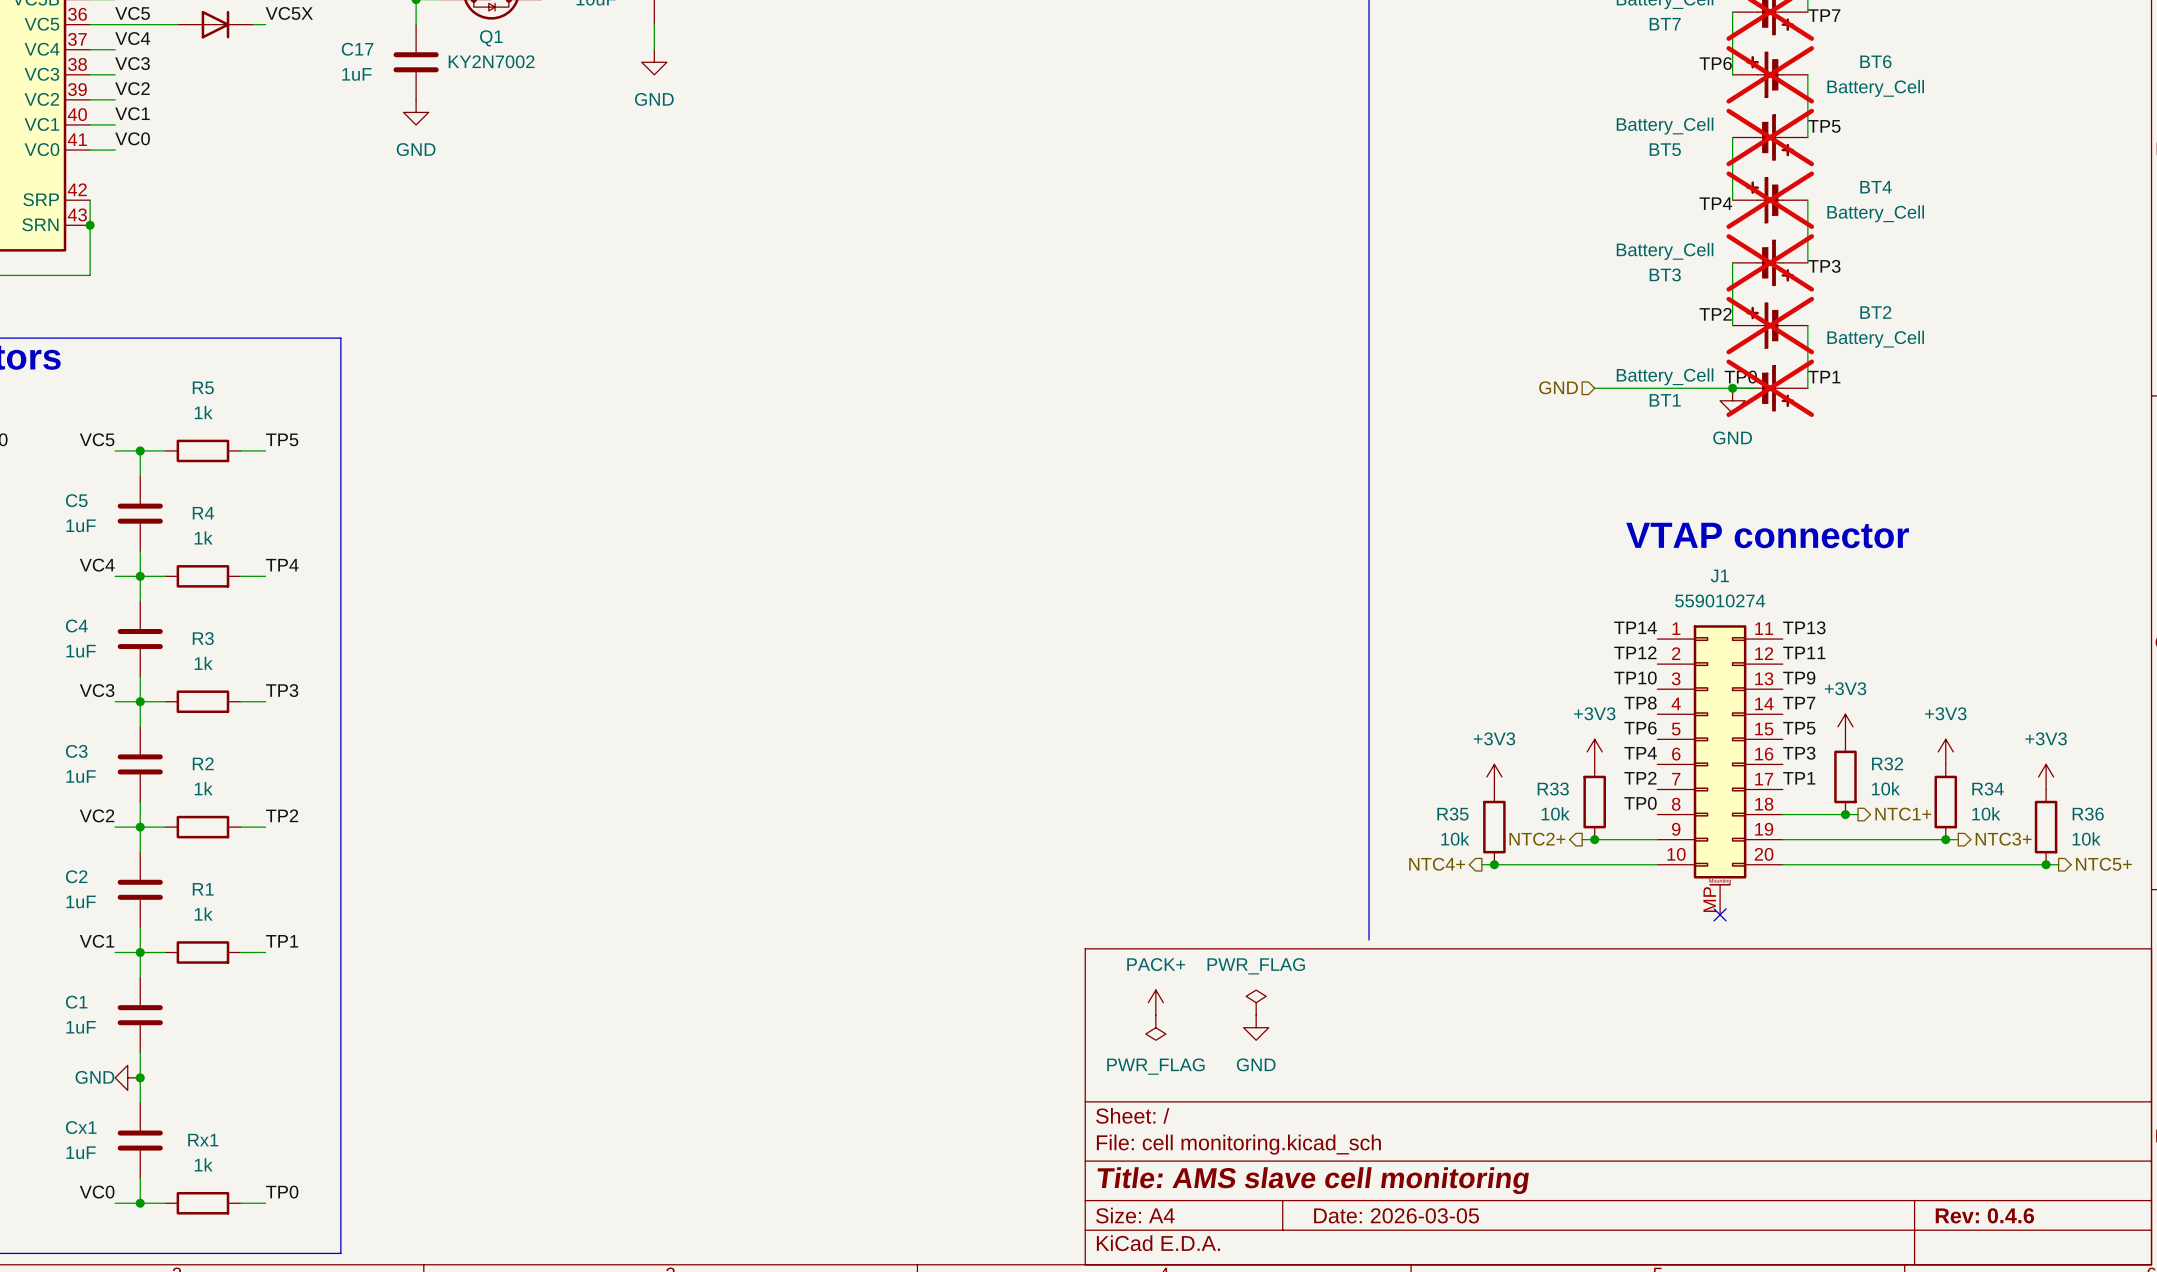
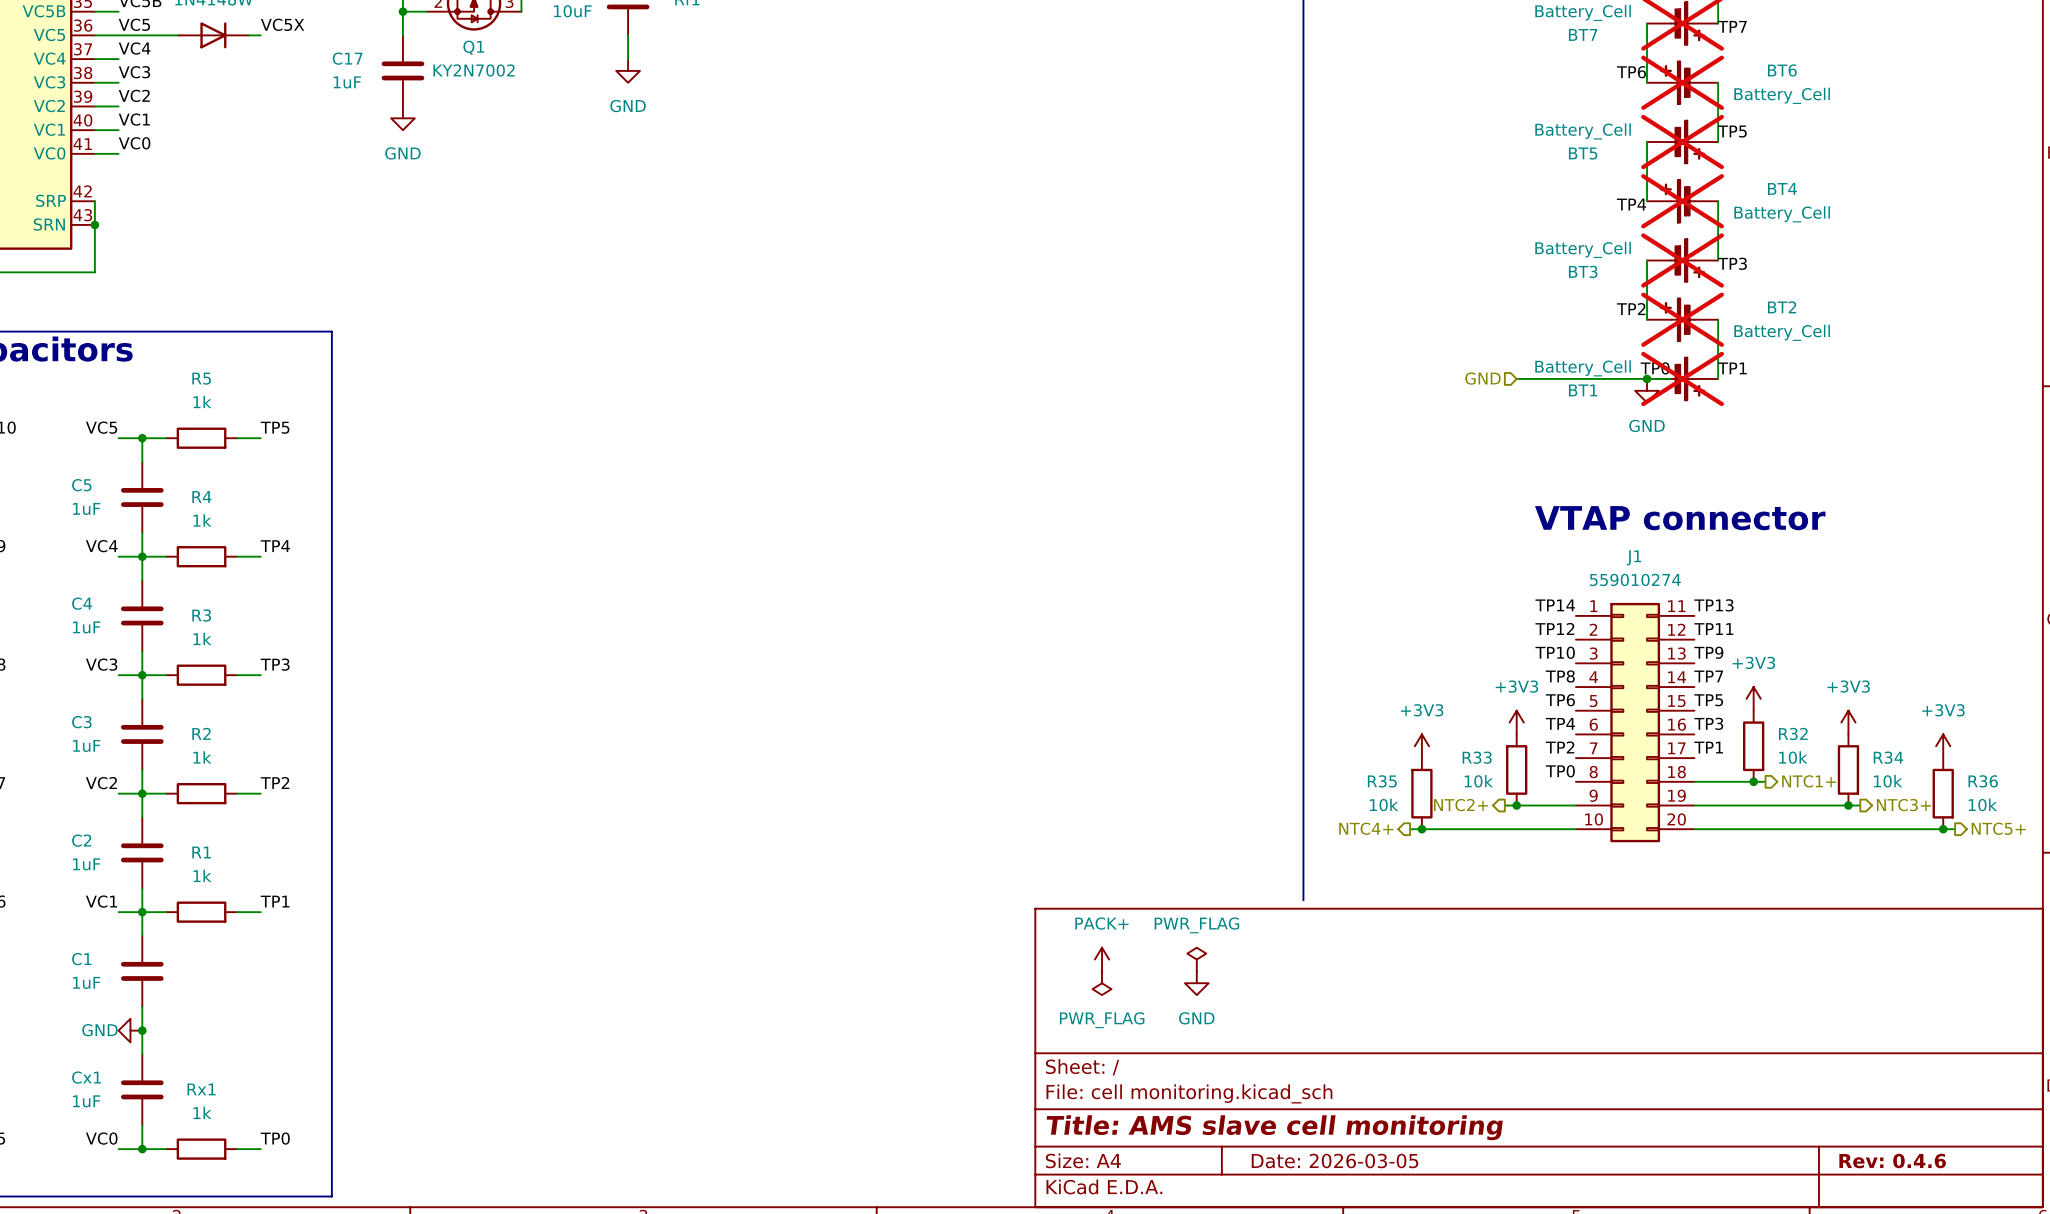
J1 symbol: [1657, 625, 1783, 915] -> [1575, 602, 1695, 843]
no-connect mark: (1720, 914) -> none

